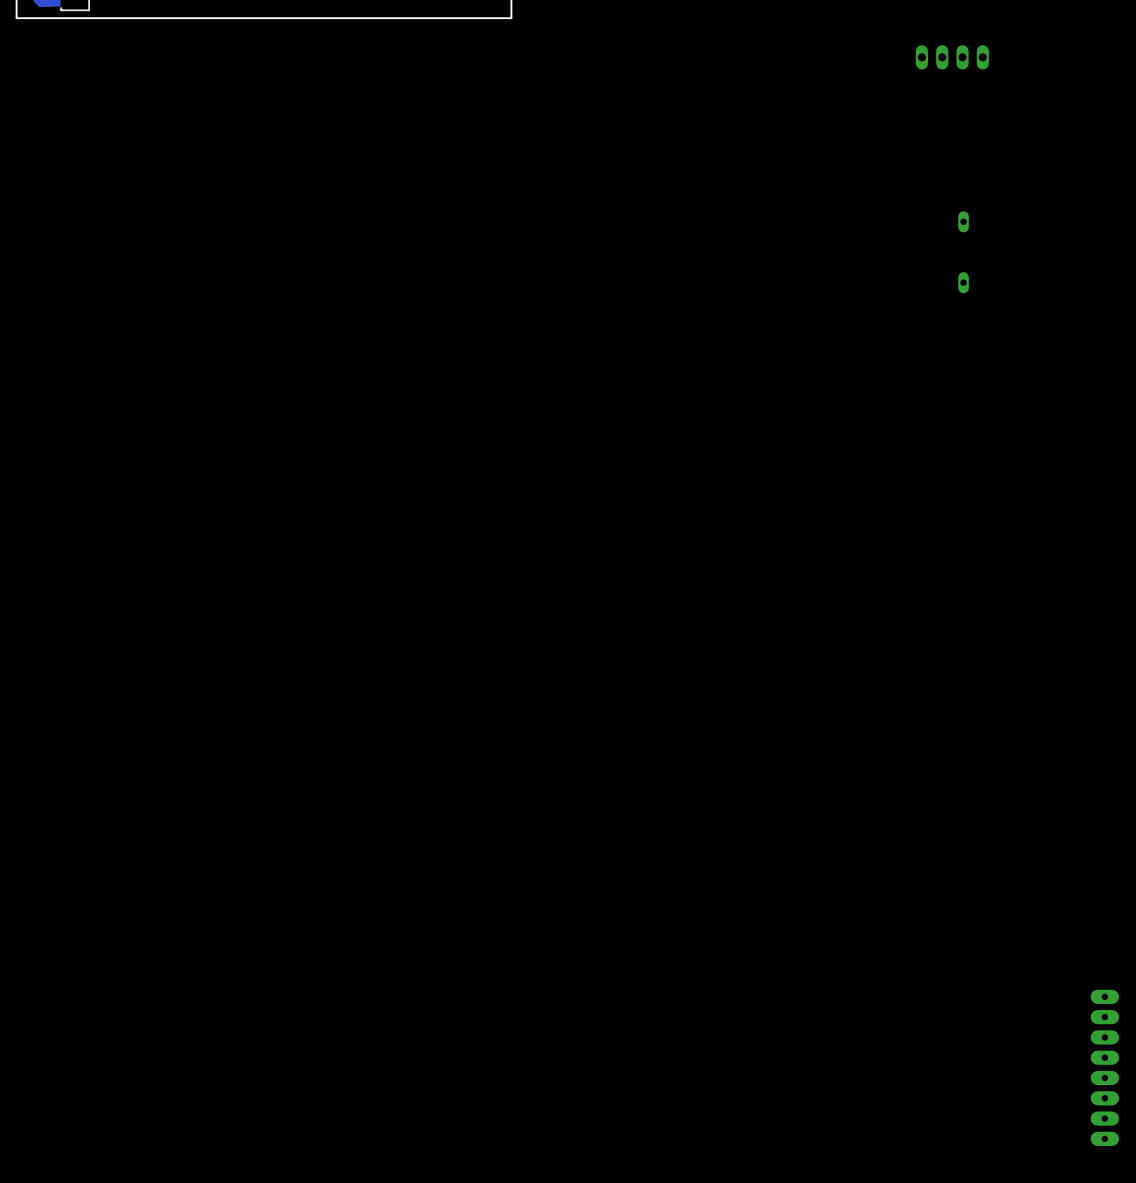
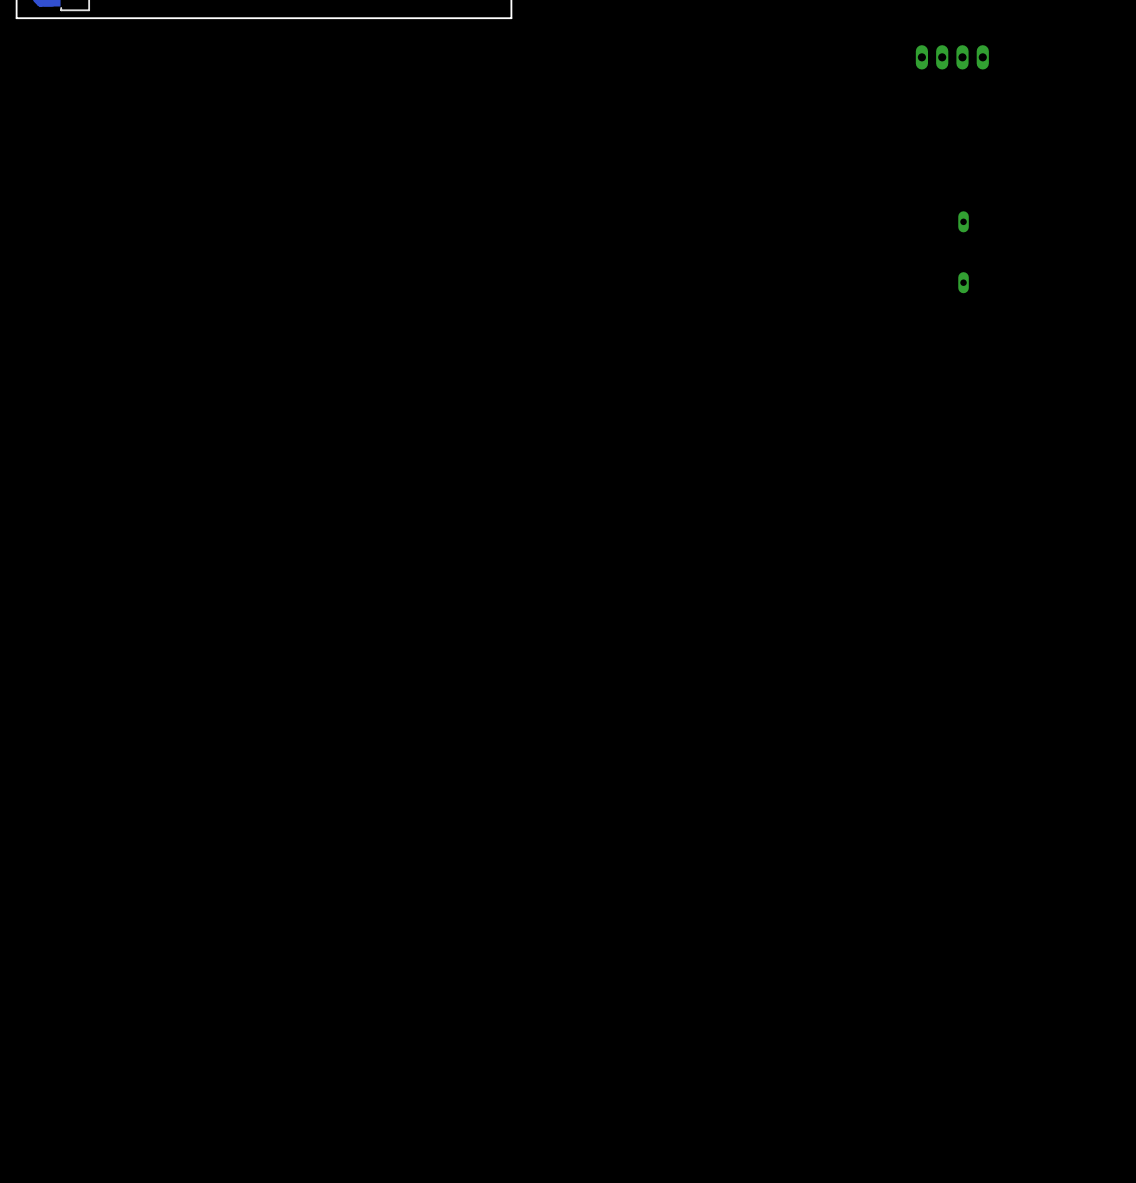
part: (1104, 1067) -> none

